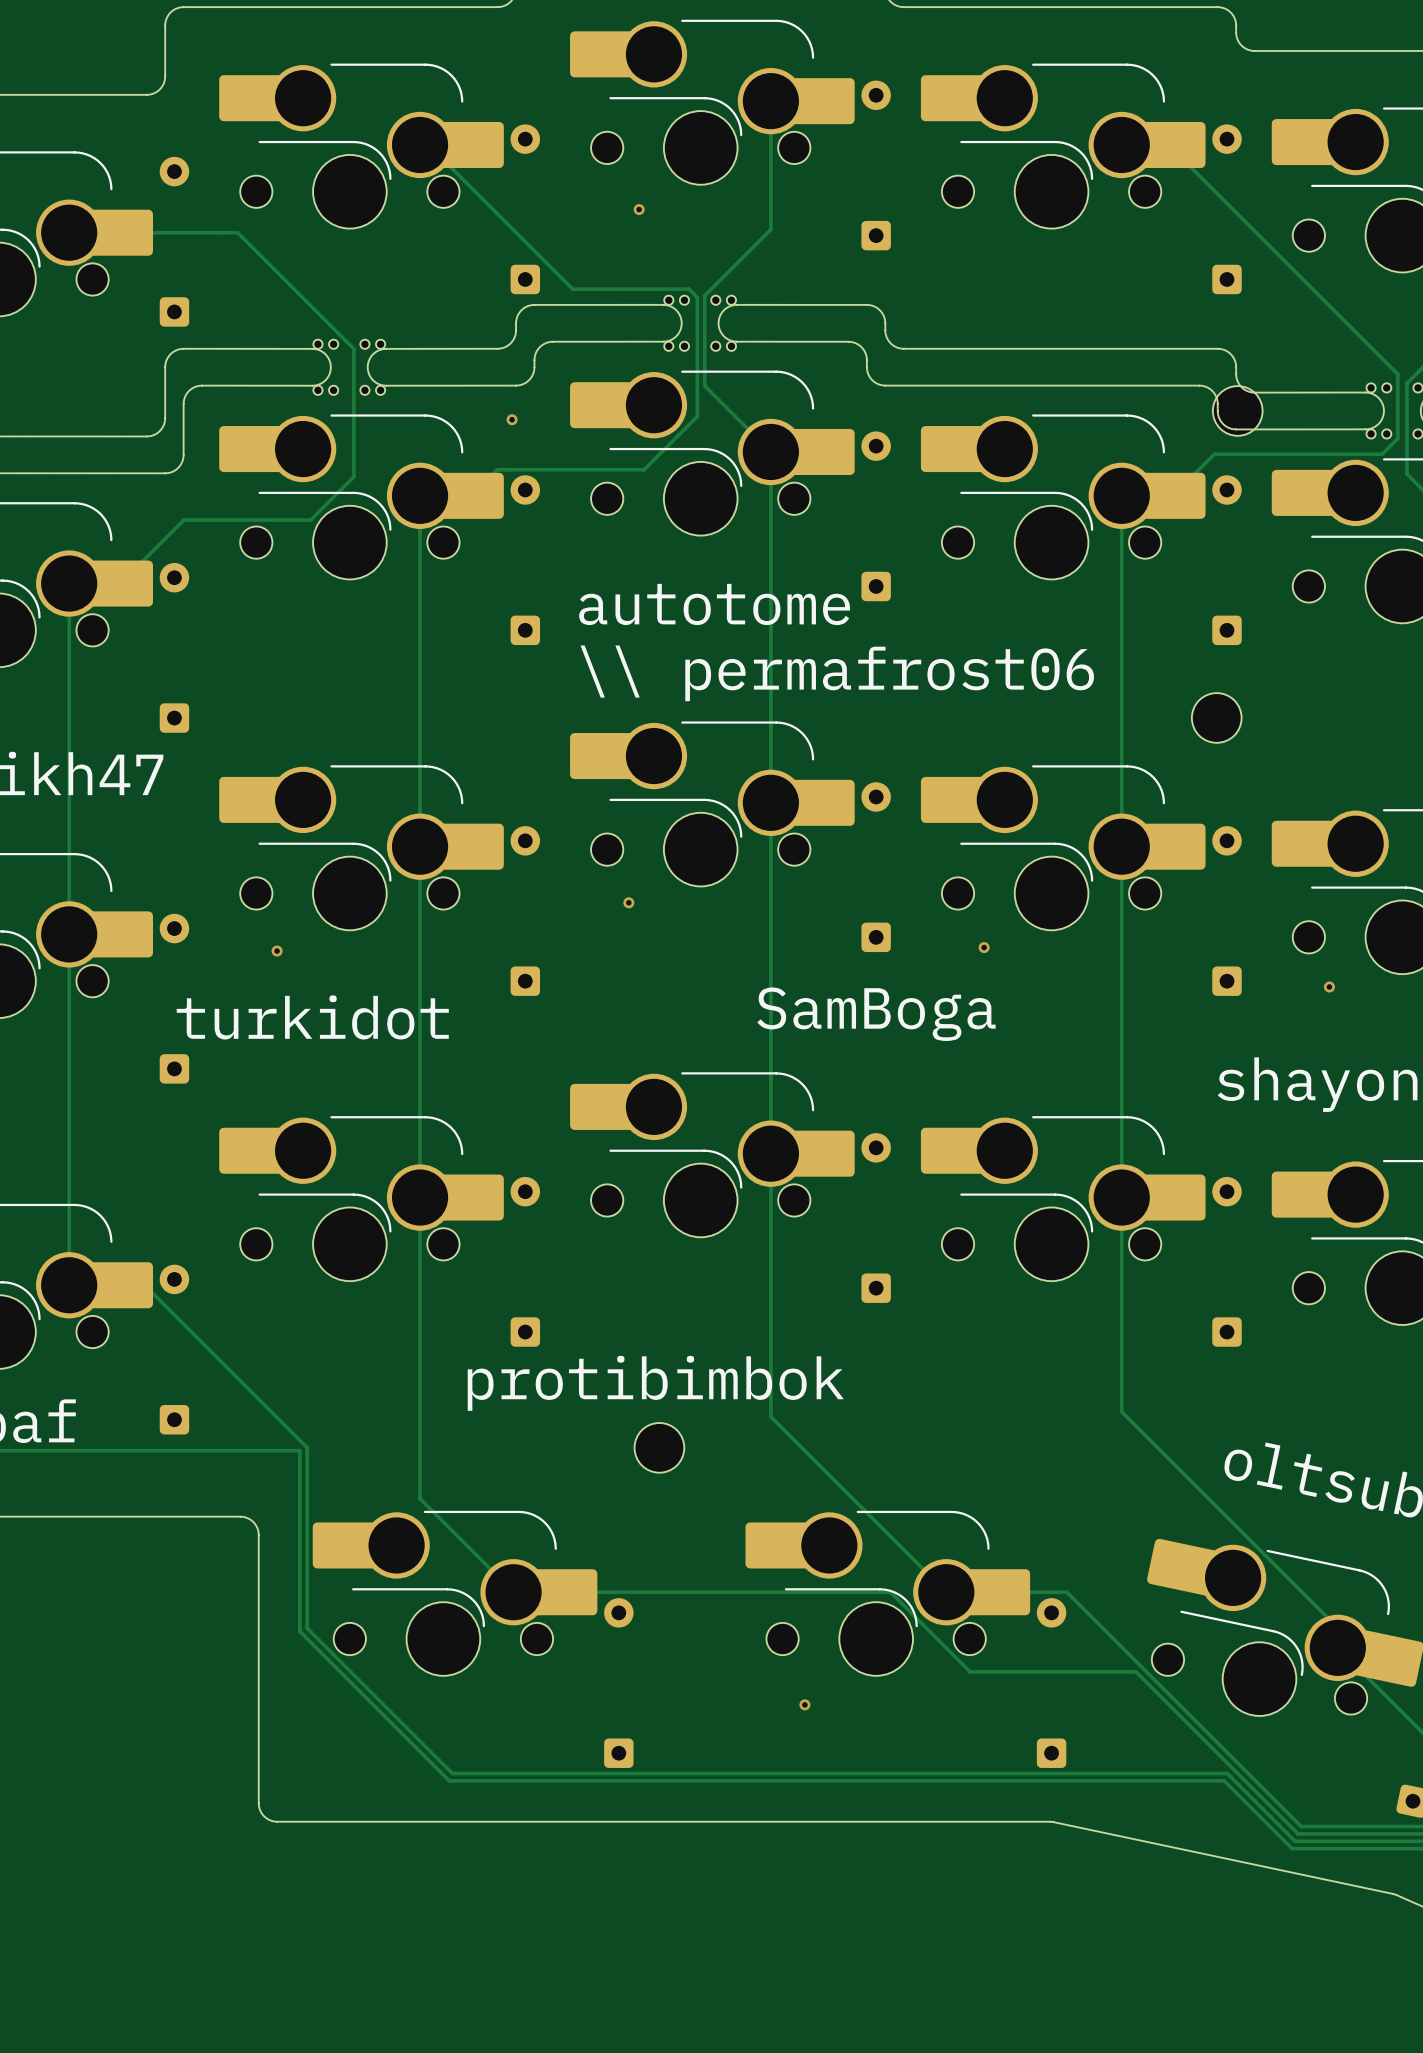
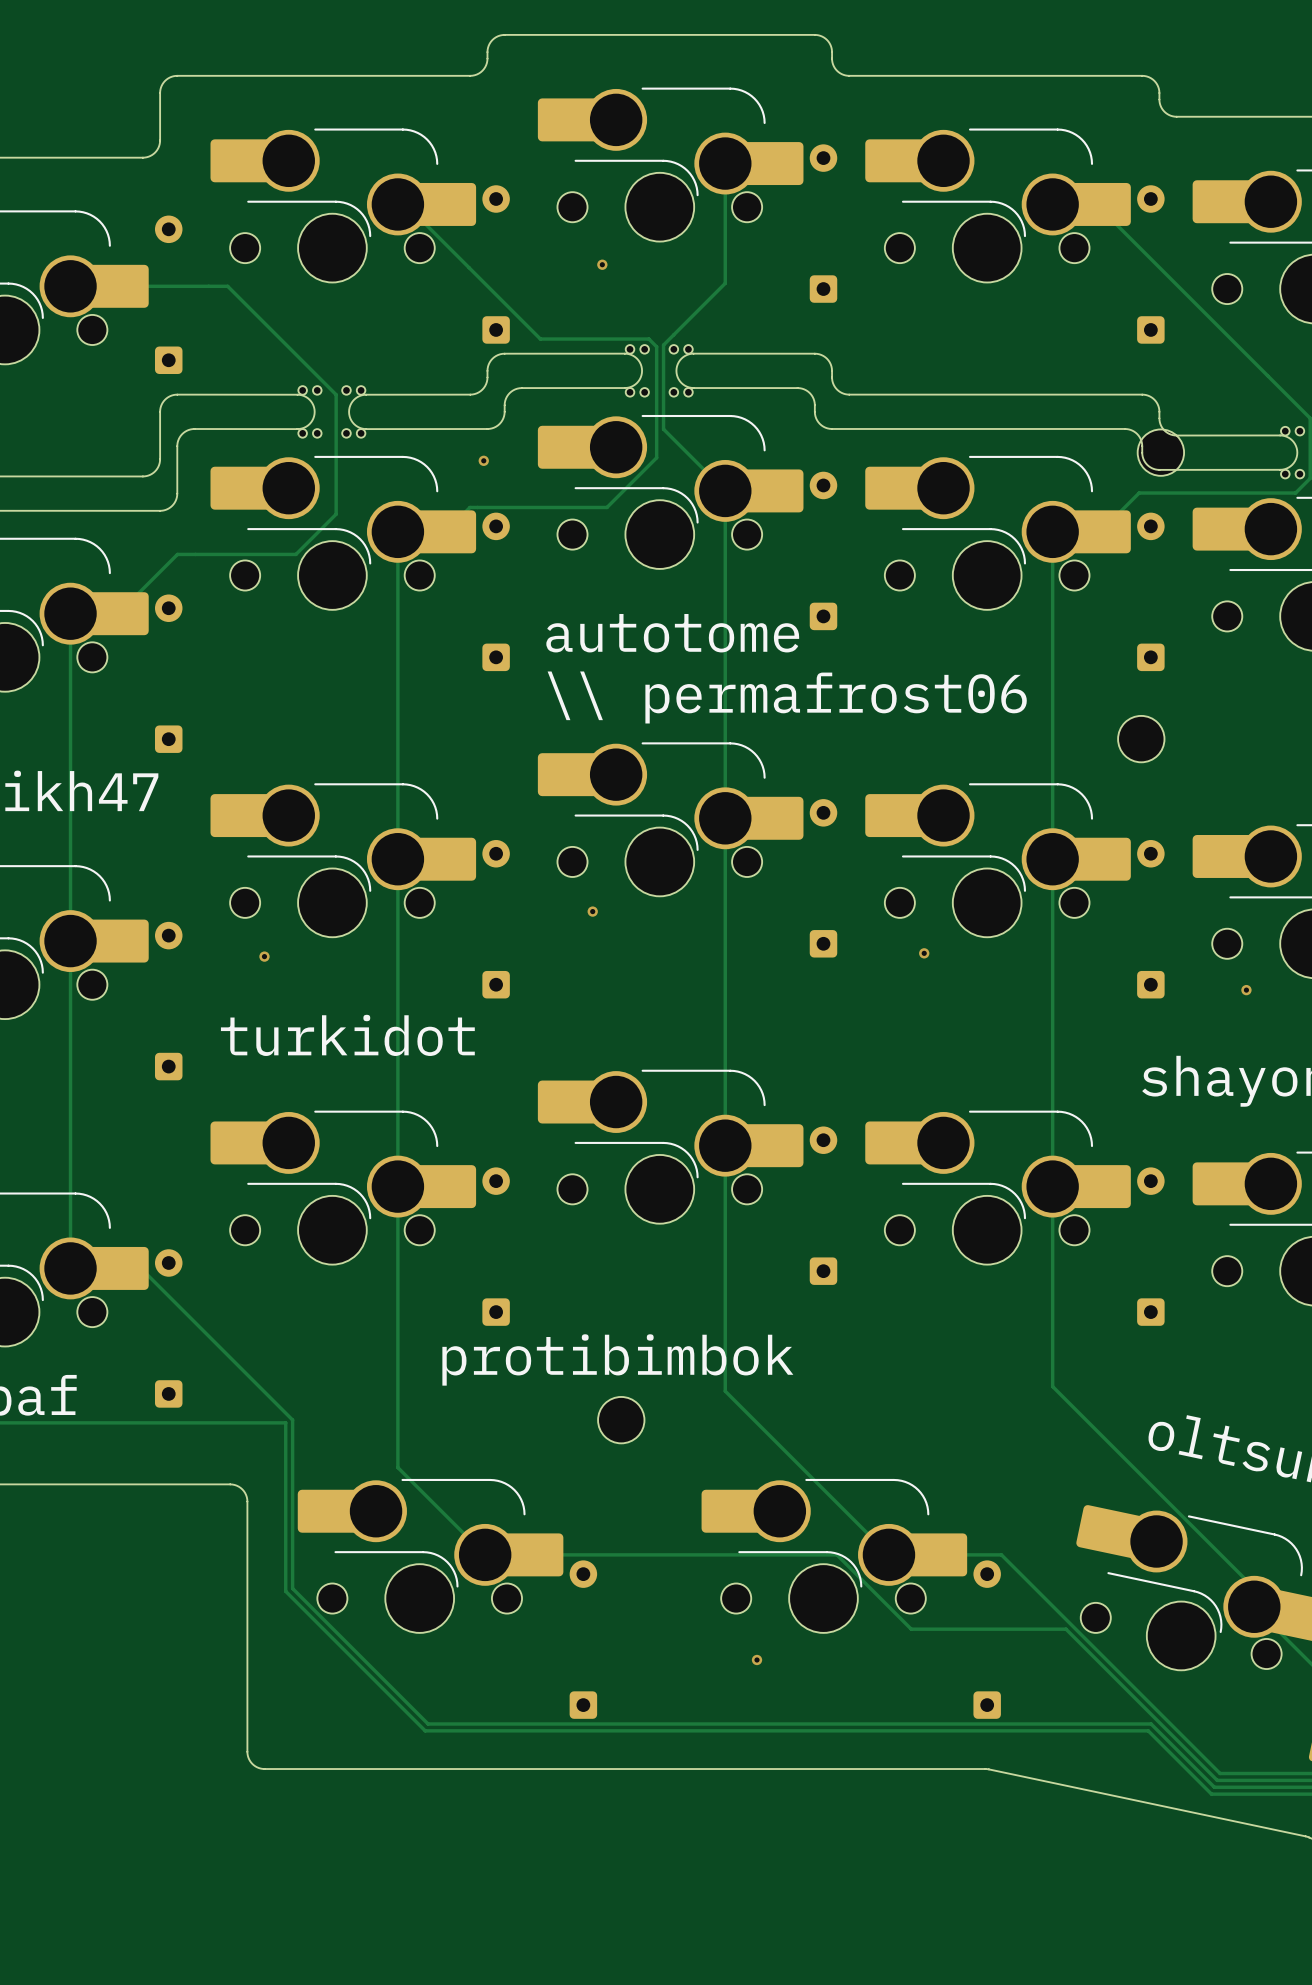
text: SamBoga (876, 1014) -> none
text position: turkidot (312, 1017) -> turkidot (347, 1035)

